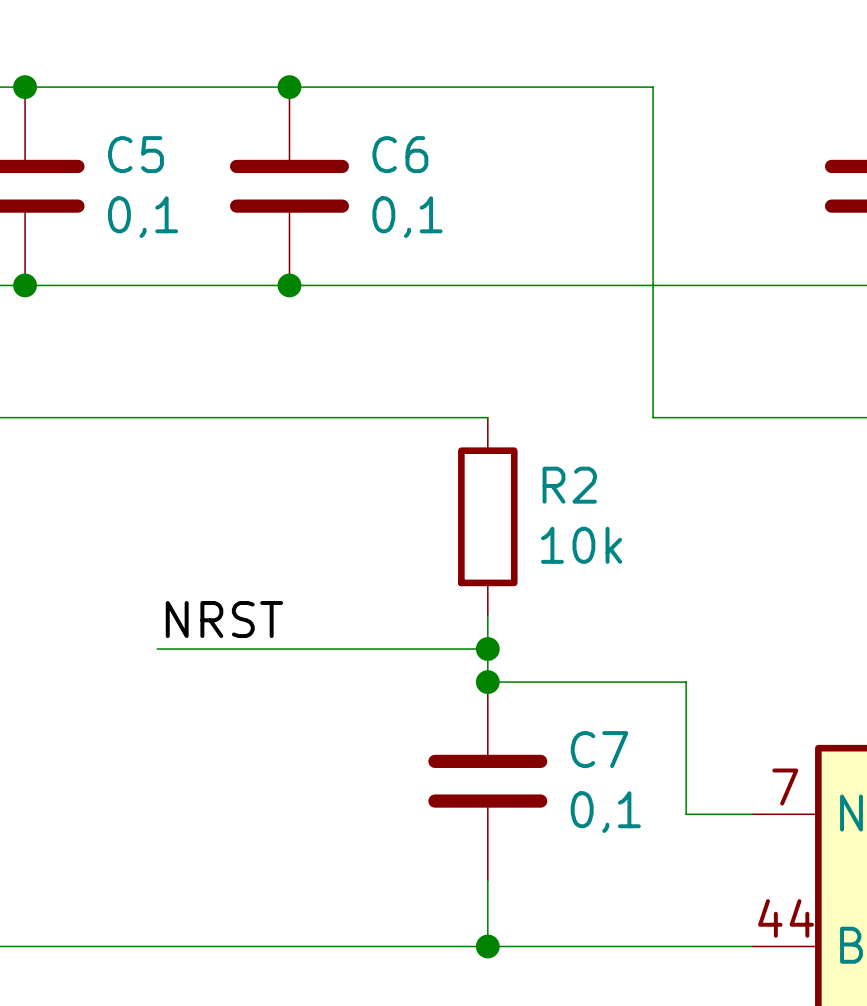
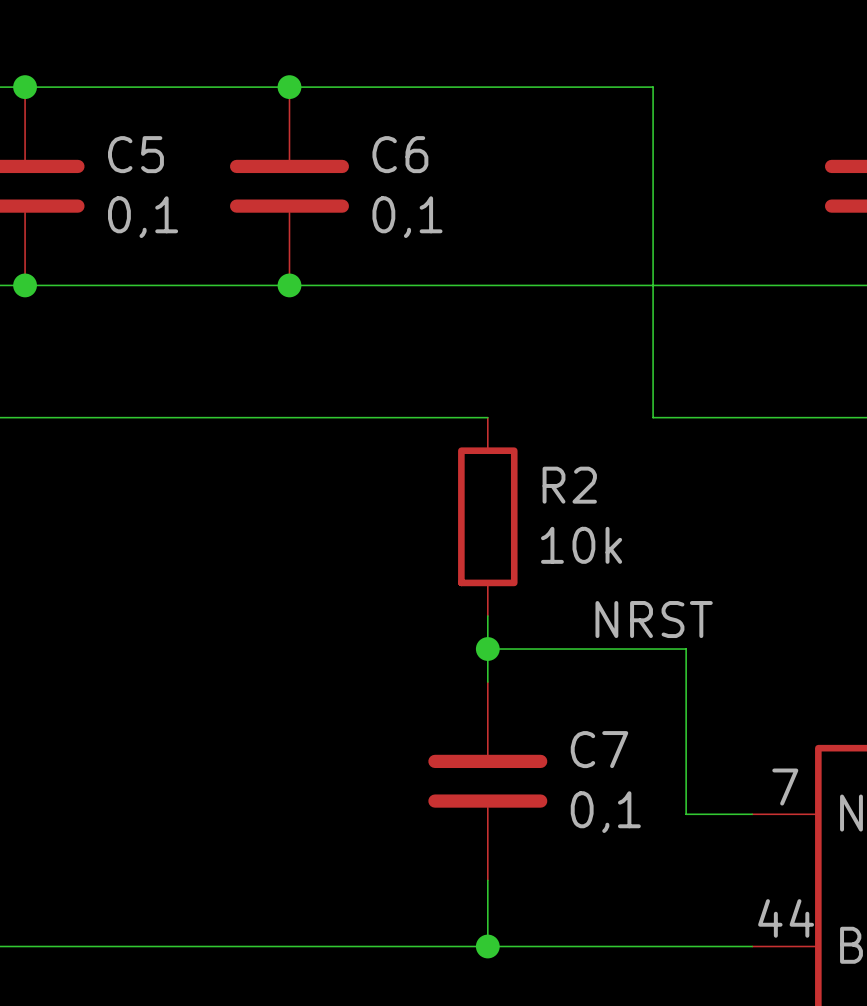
label position: NRST (224, 619) -> NRST (654, 619)
wire: (157, 649) (487, 649) -> none
wire: (487, 682) (686, 682) -> (487, 649) (686, 649) (686, 682)
junction: (487, 682) -> none

